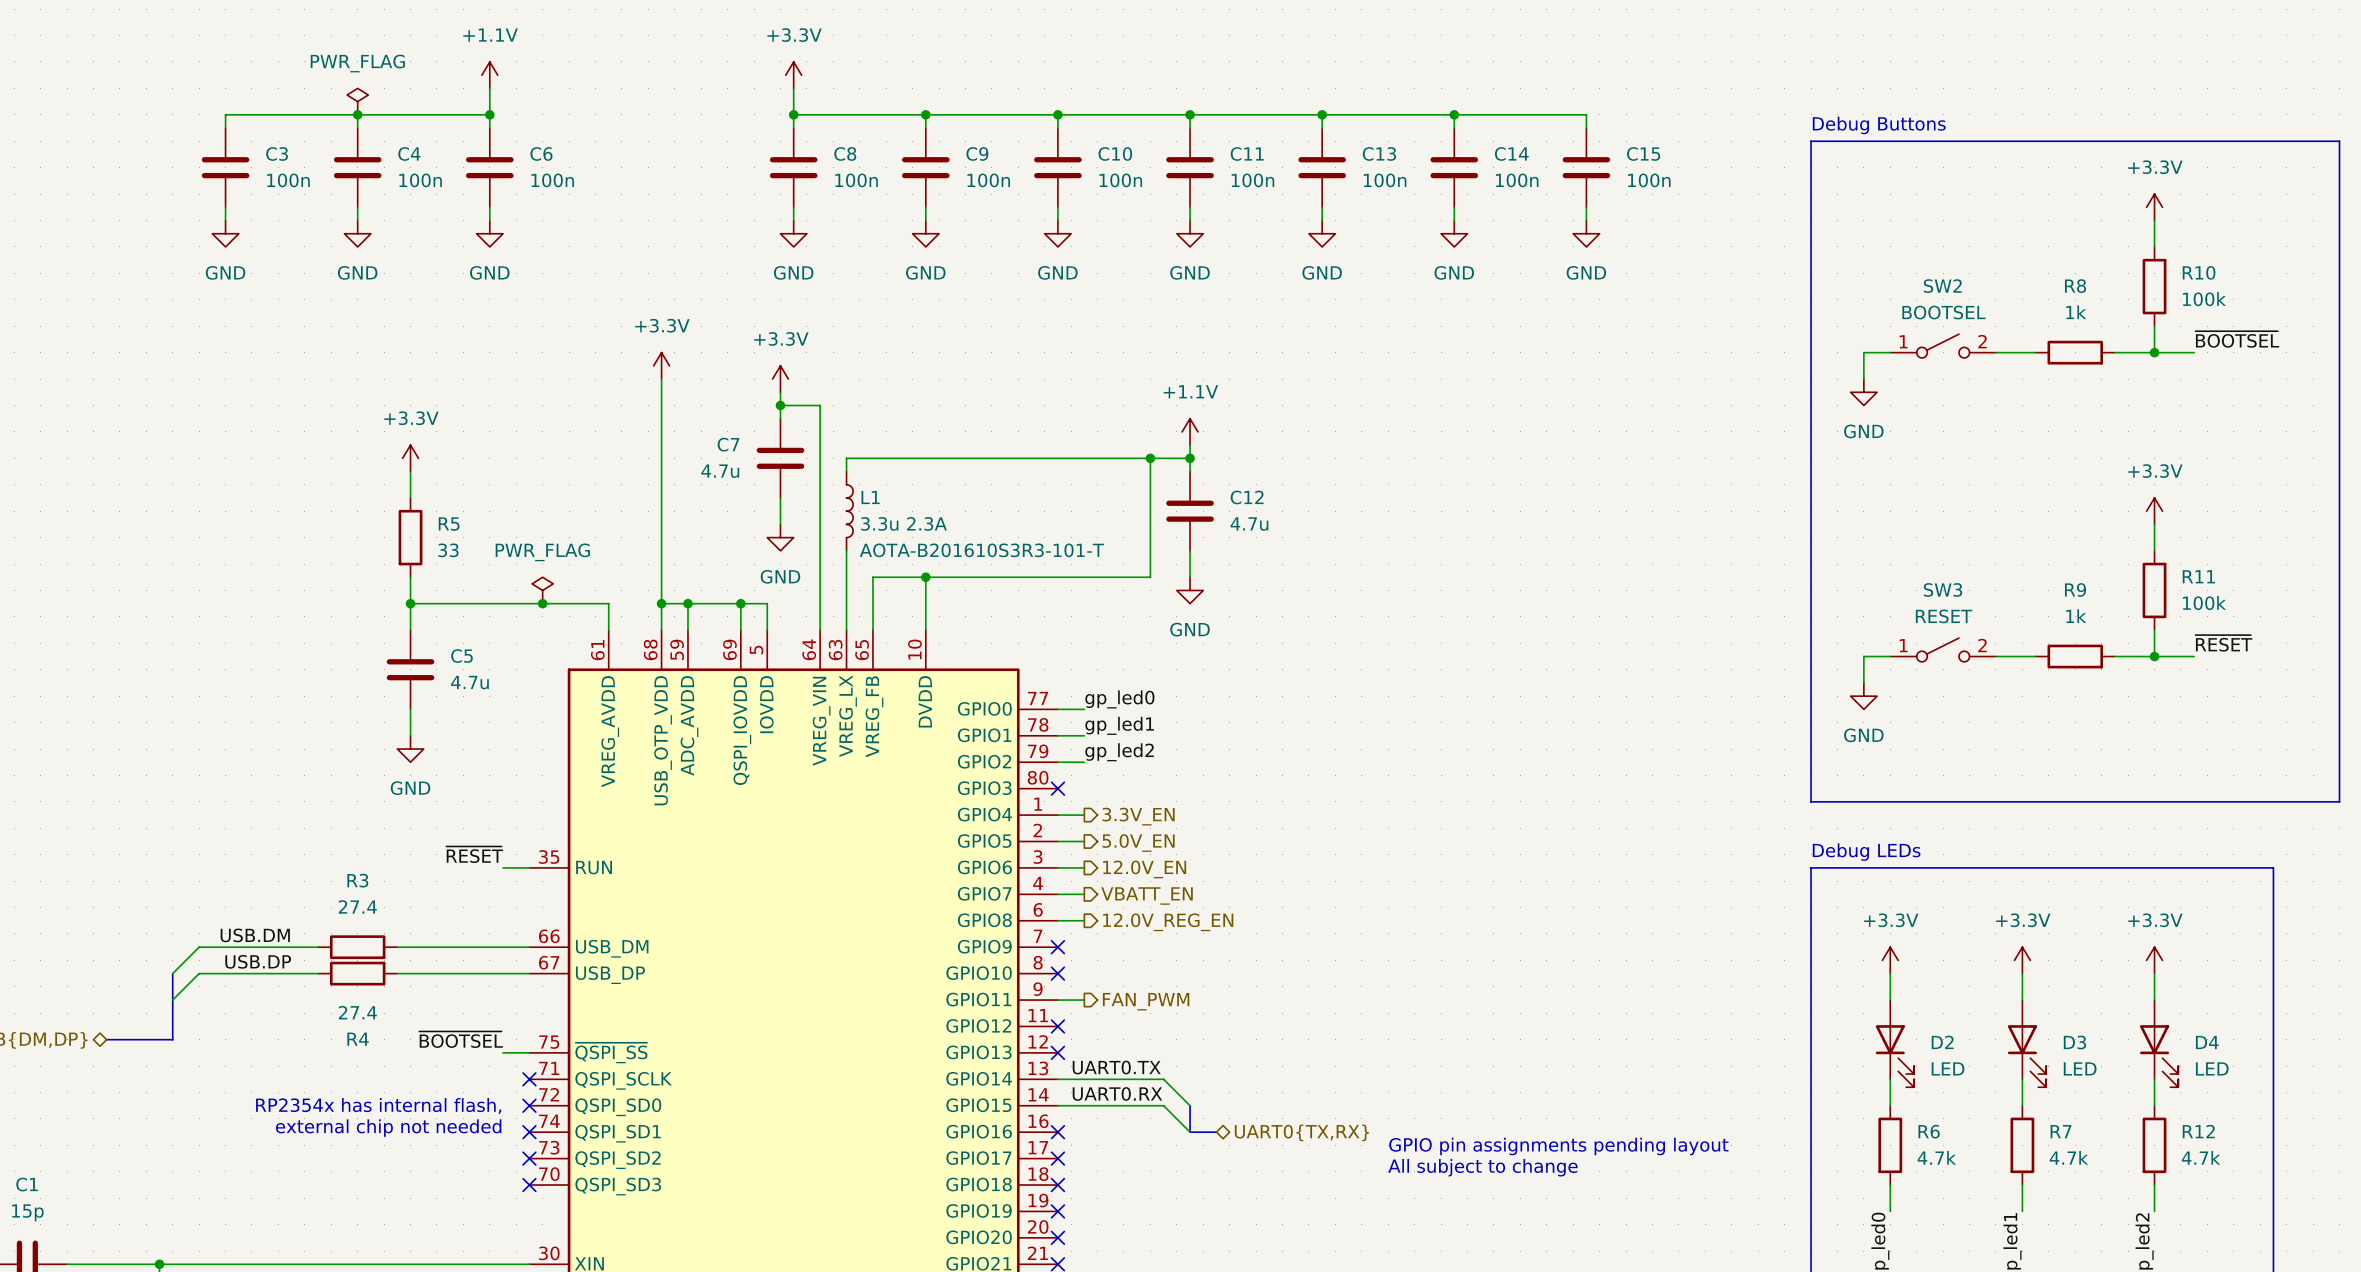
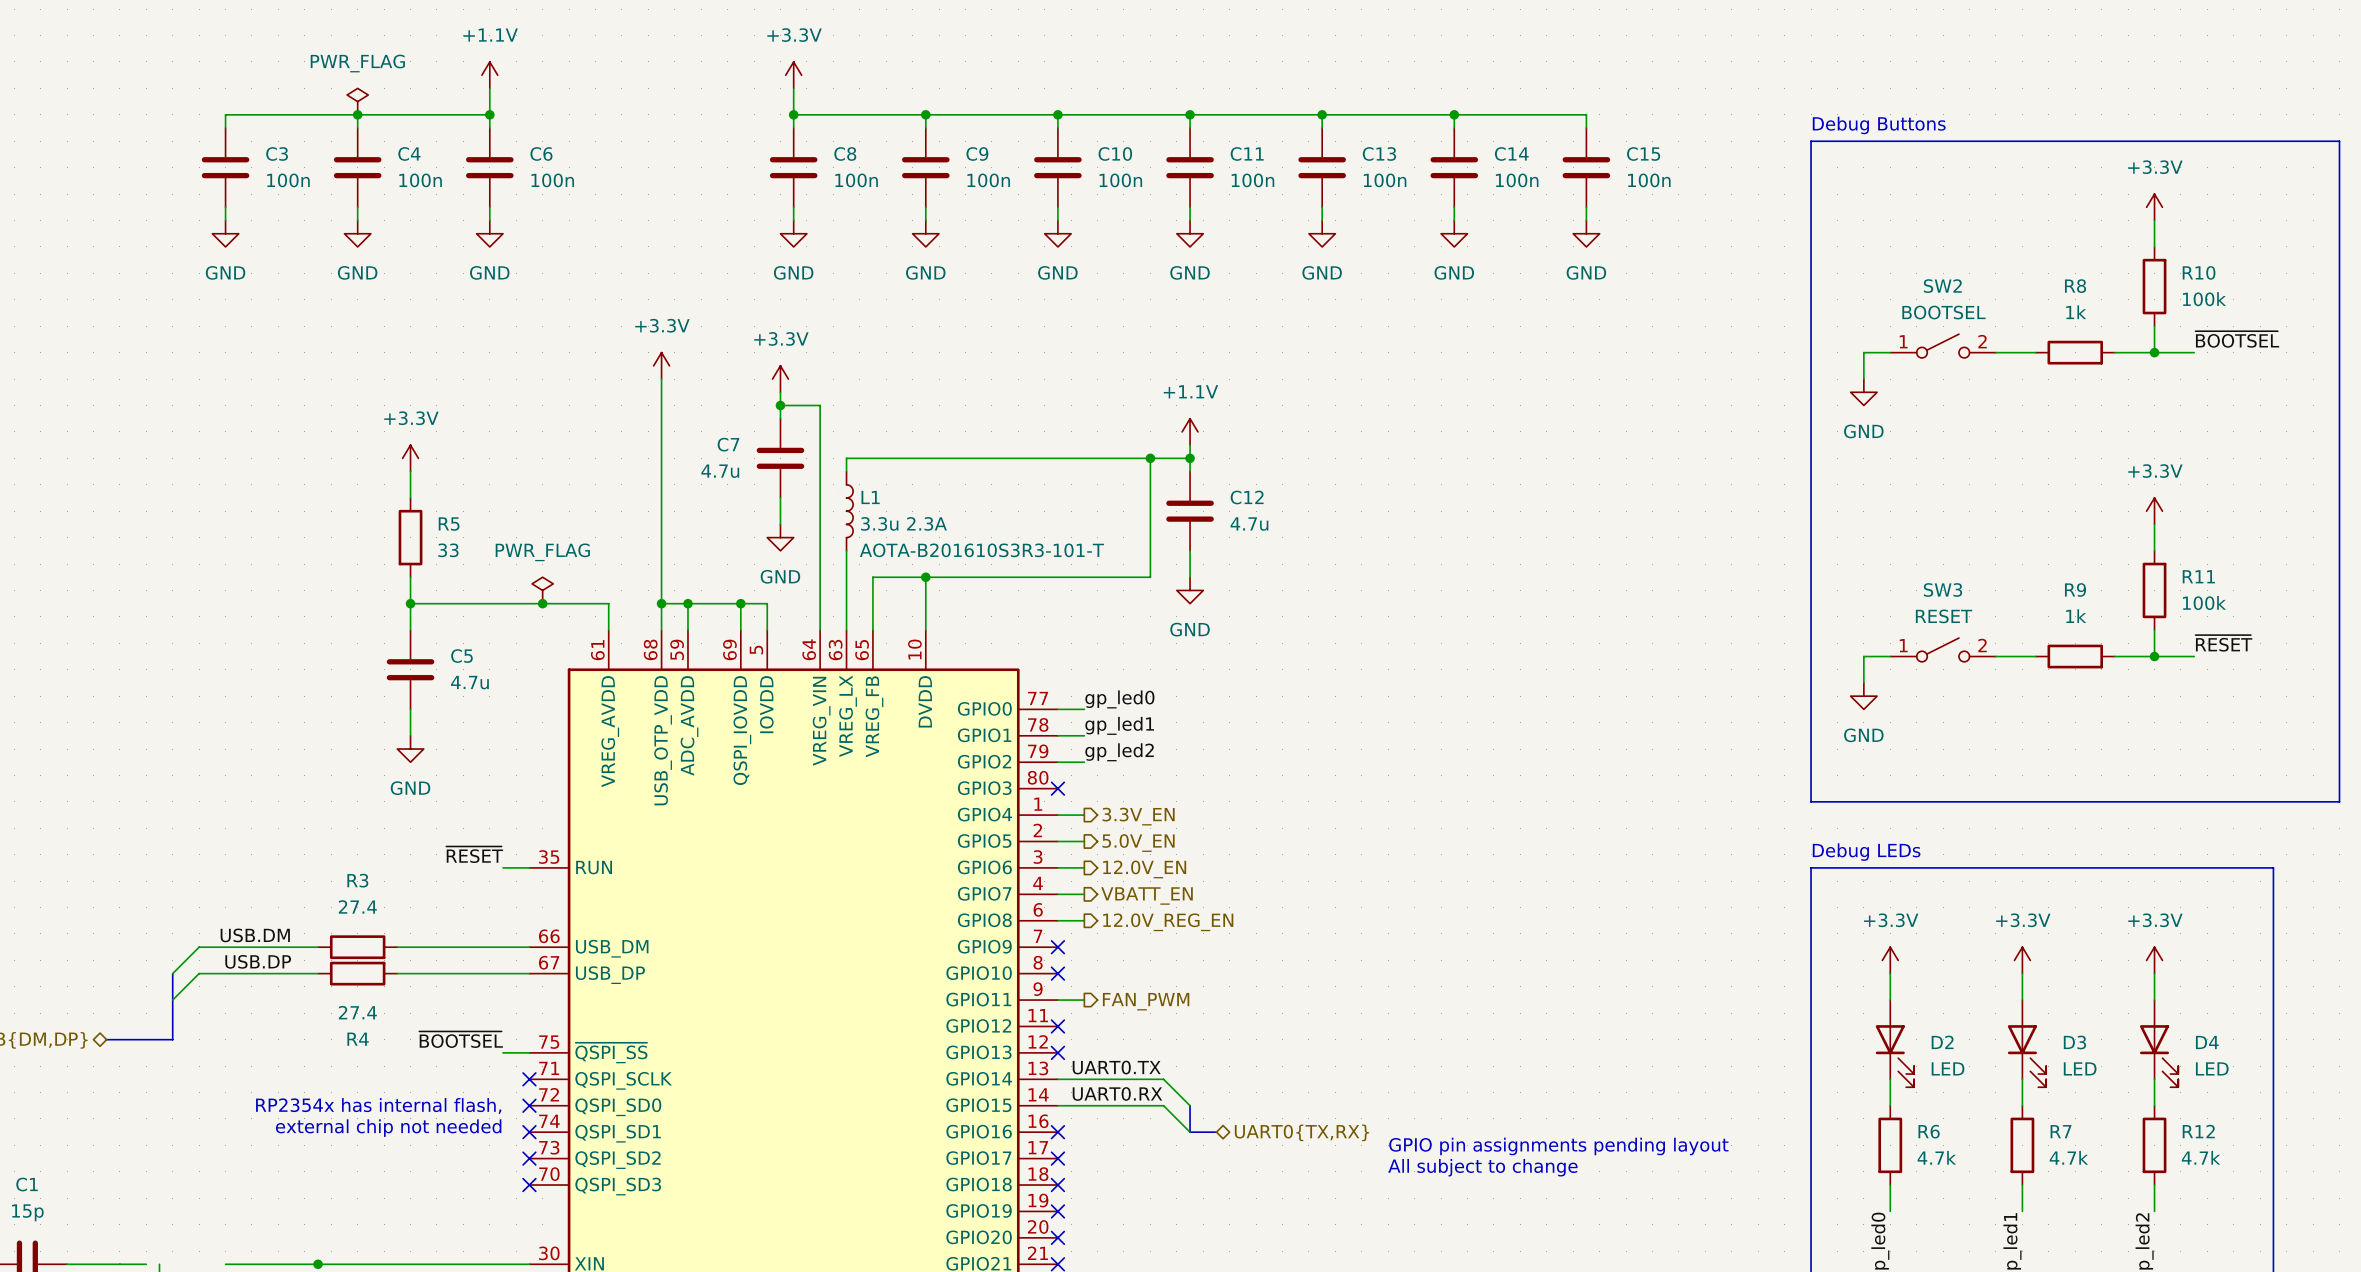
wire: (146, 1264) (225, 1264) -> none
junction: (159, 1264) -> none
junction: none -> (318, 1264)

